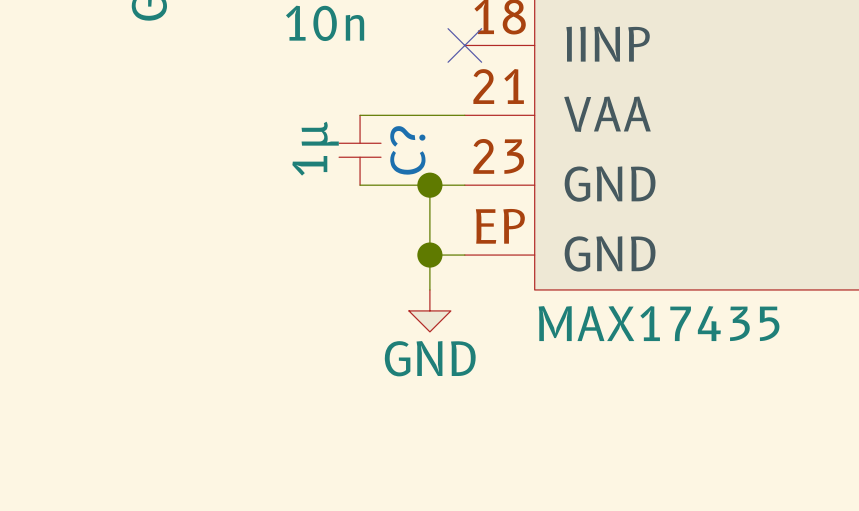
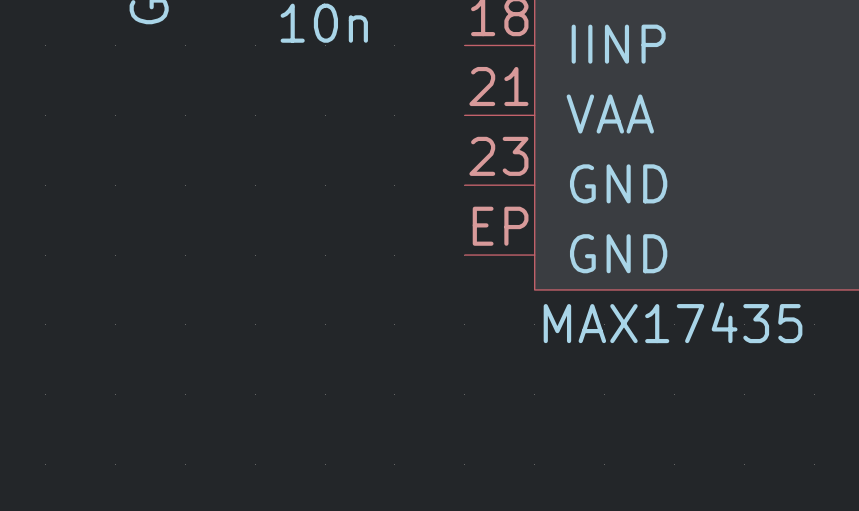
no-connect mark: (464, 45) -> none
wire: (360, 115) (464, 115) -> none
C?: 1µ (360, 150) -> none
wire: (360, 185) (464, 185) -> none
wire: (429, 185) (429, 289) -> none
junction: (429, 185) -> none
wire: (429, 255) (464, 255) -> none
junction: (429, 255) -> none
power symbol: GND (429, 310) -> none

